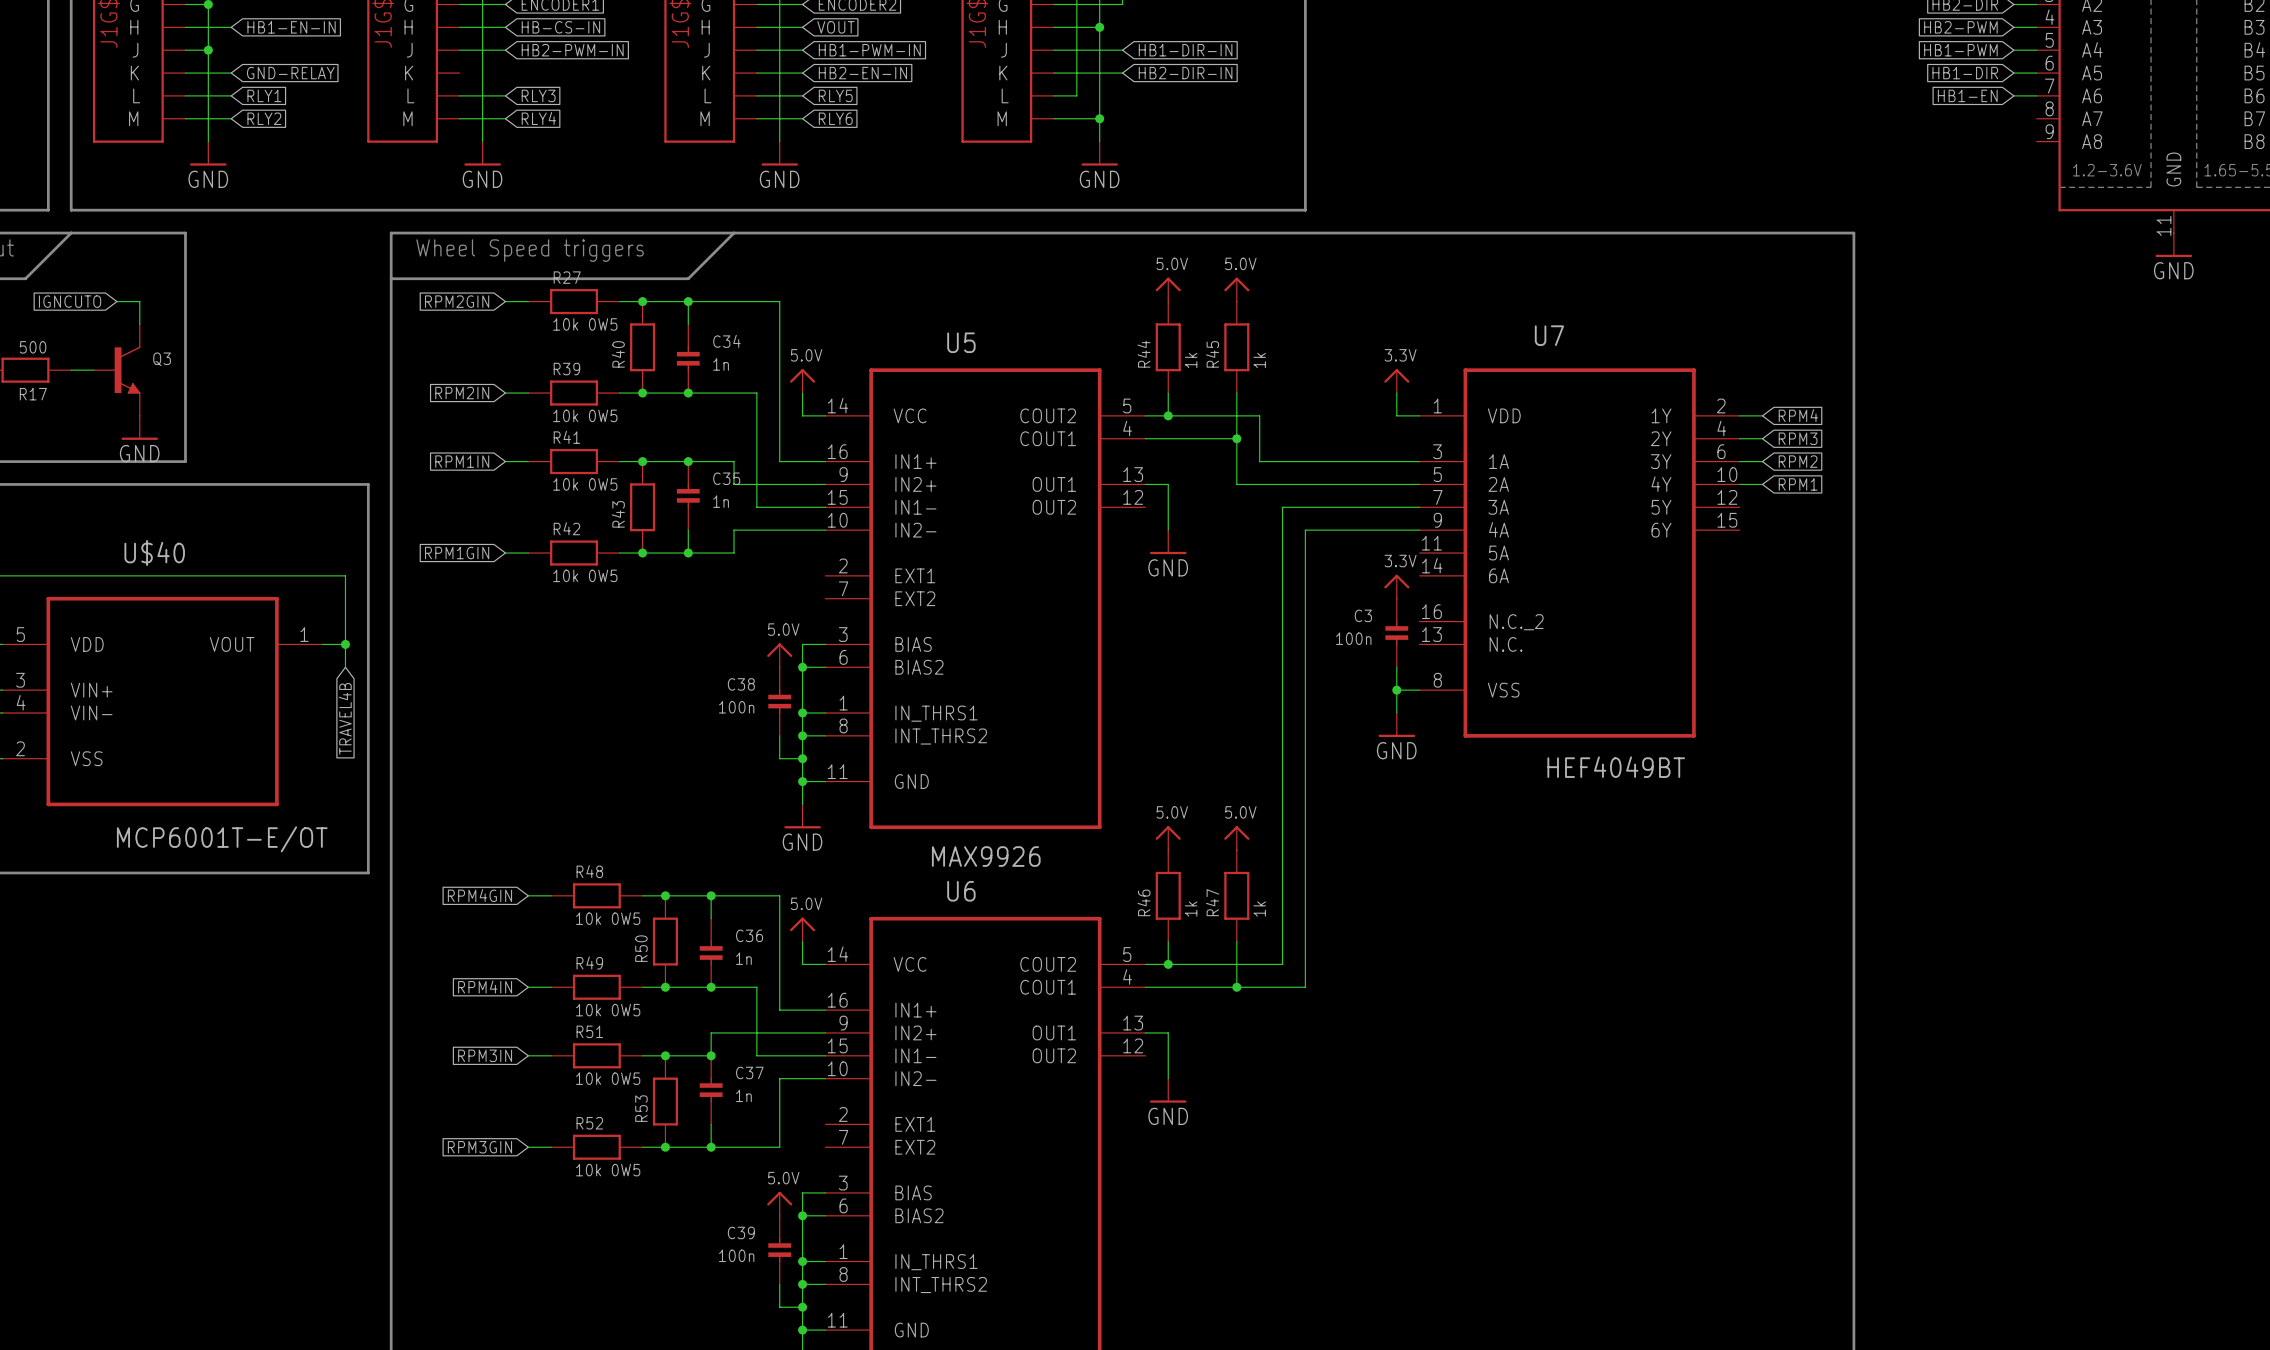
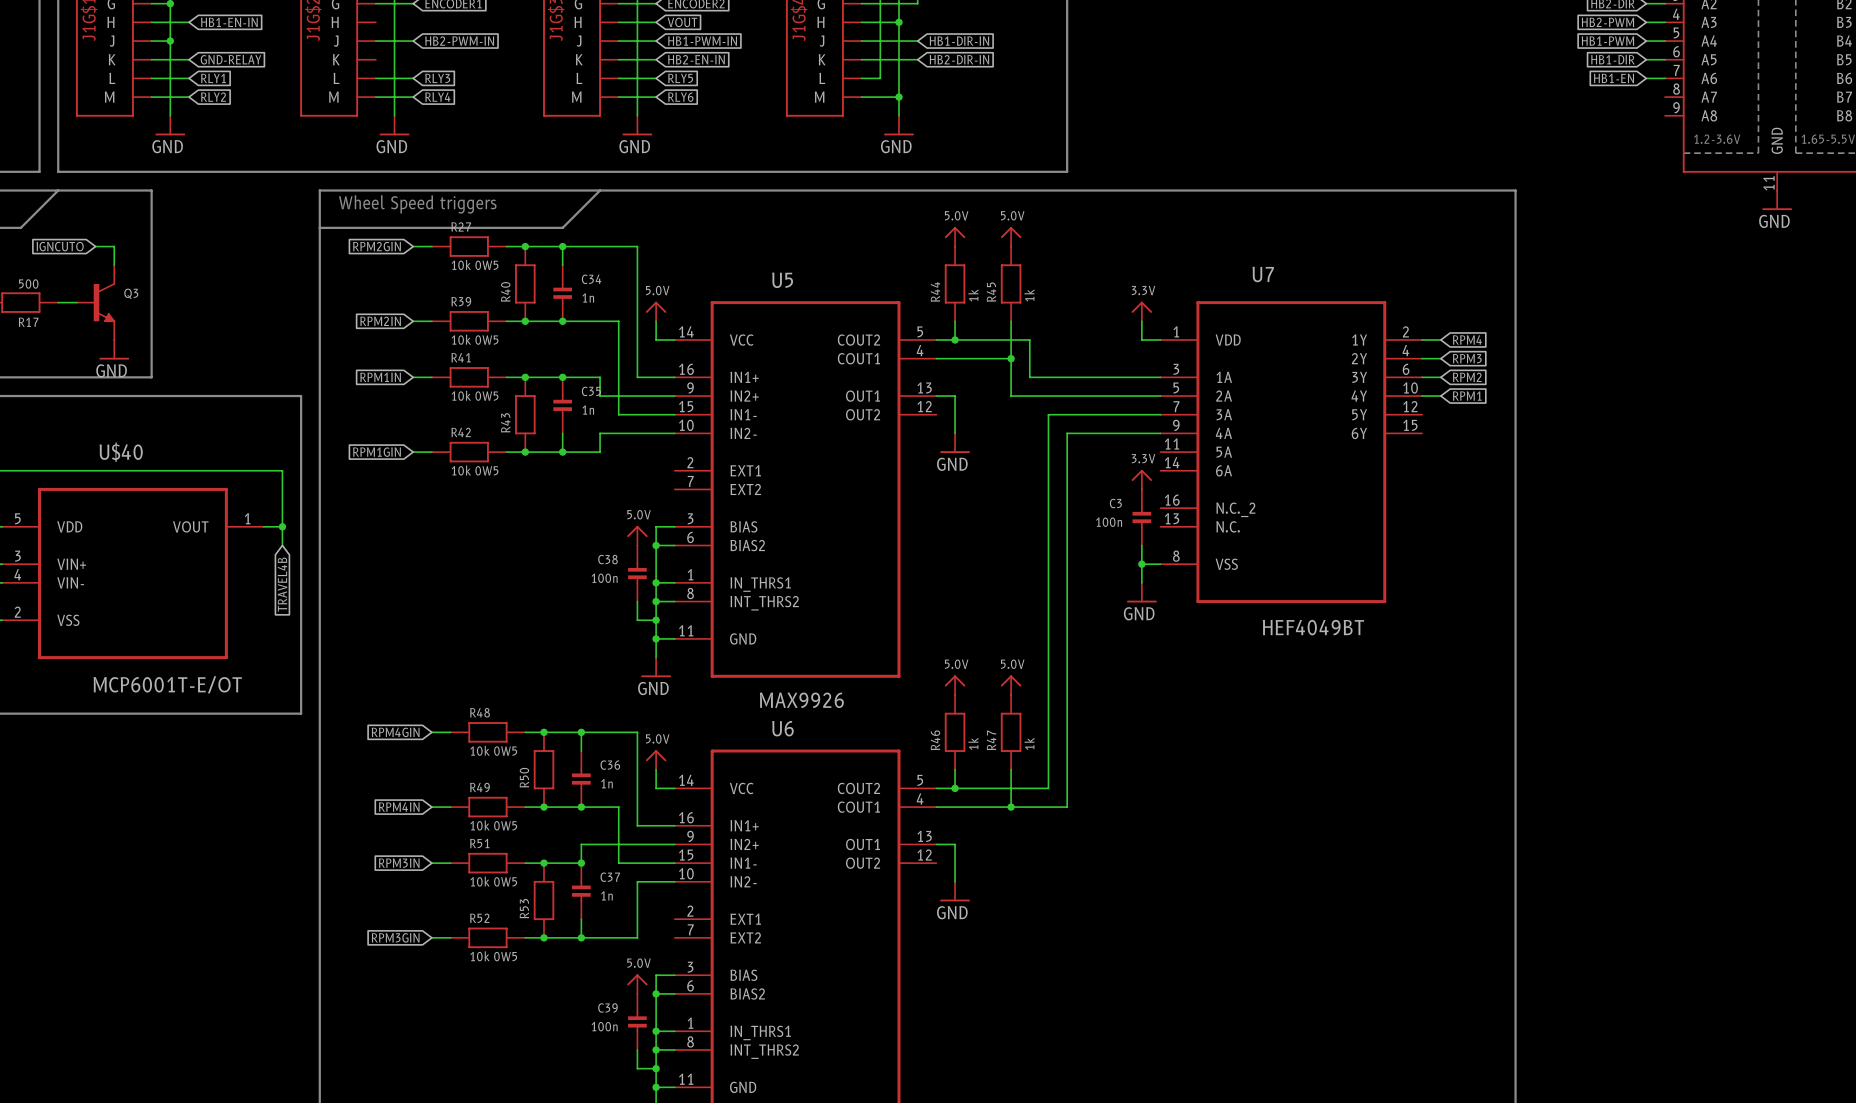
wire: (459, 27) (505, 27) -> none
global label: HB-CS-IN (560, 27) -> none

